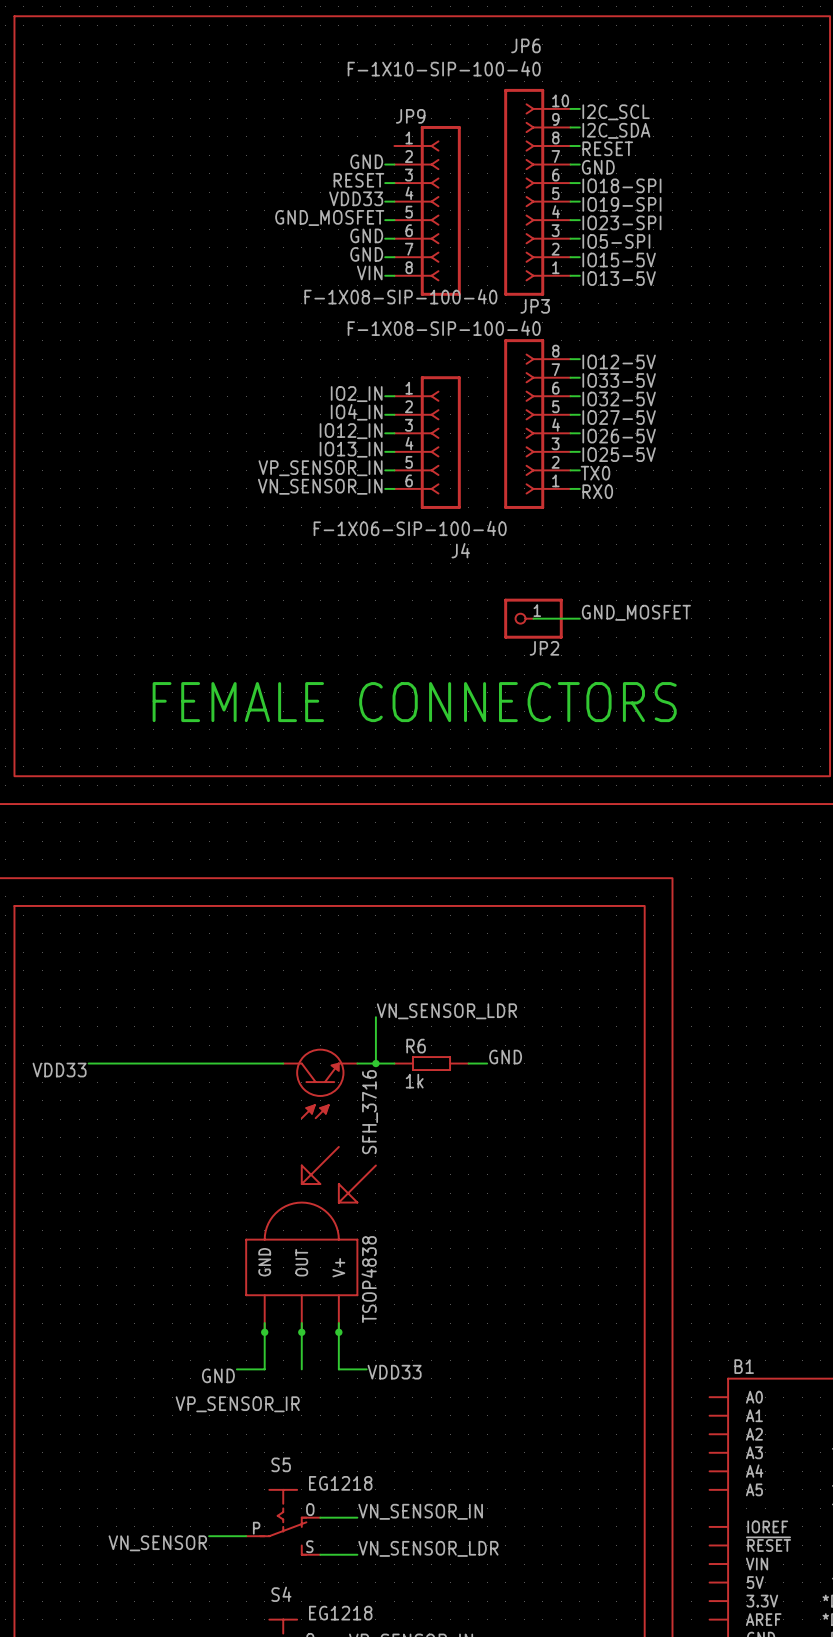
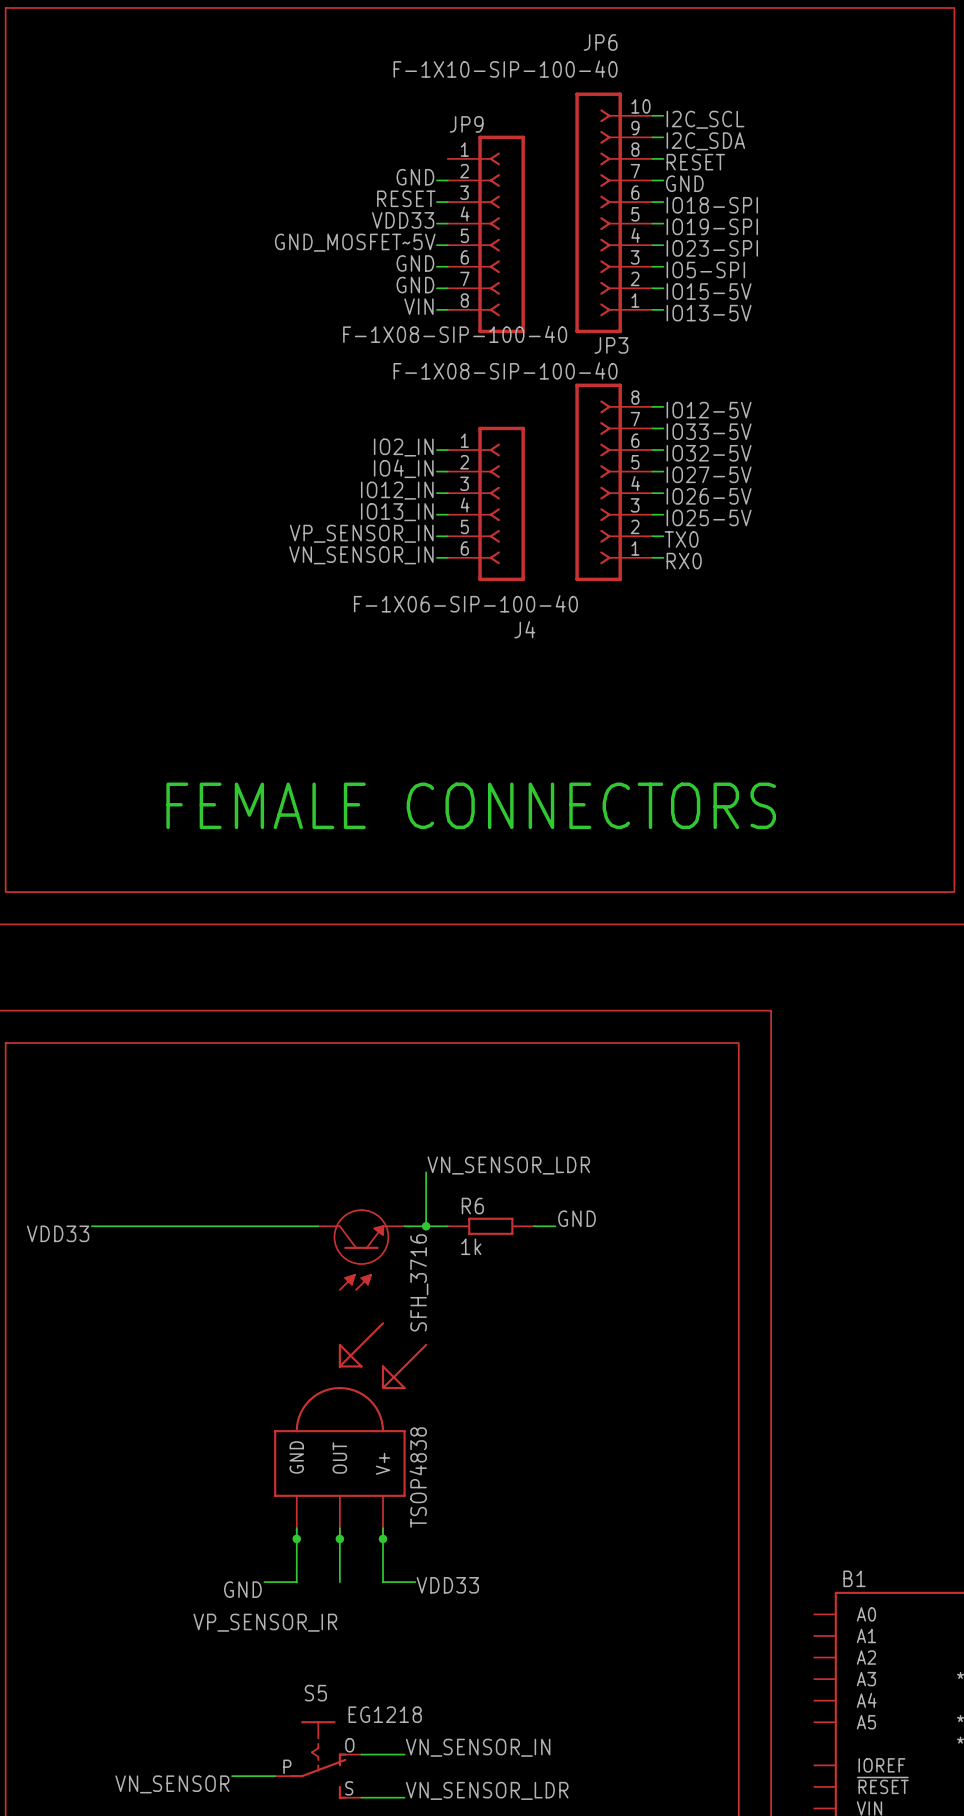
label: GND_MOSFET (329, 217) -> GND_MOSFET~5V (355, 242)
label: GND_MOSFET (636, 612) -> none
wire: (533, 618) (579, 618) -> none
JP2: (533, 618) -> none

